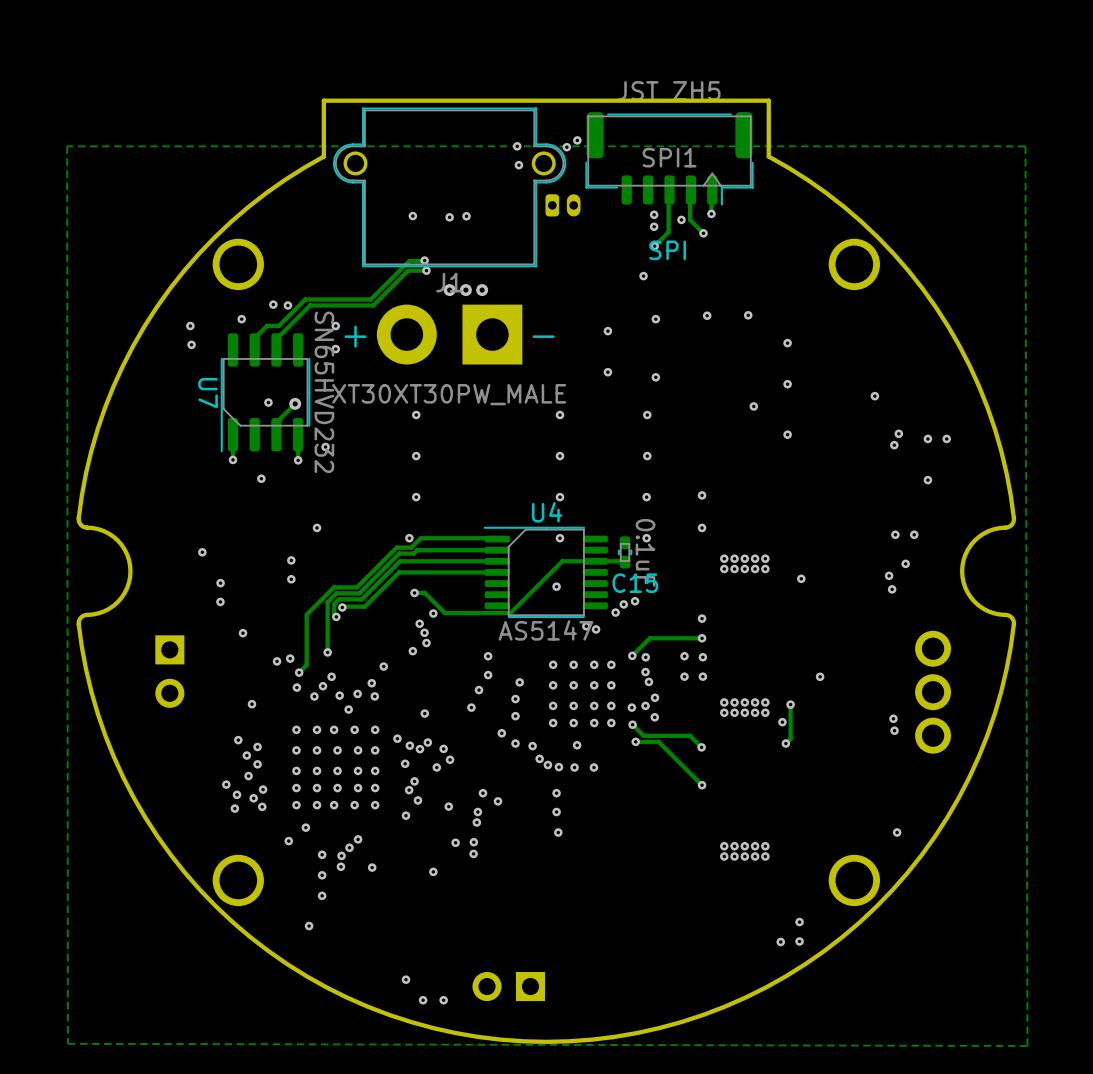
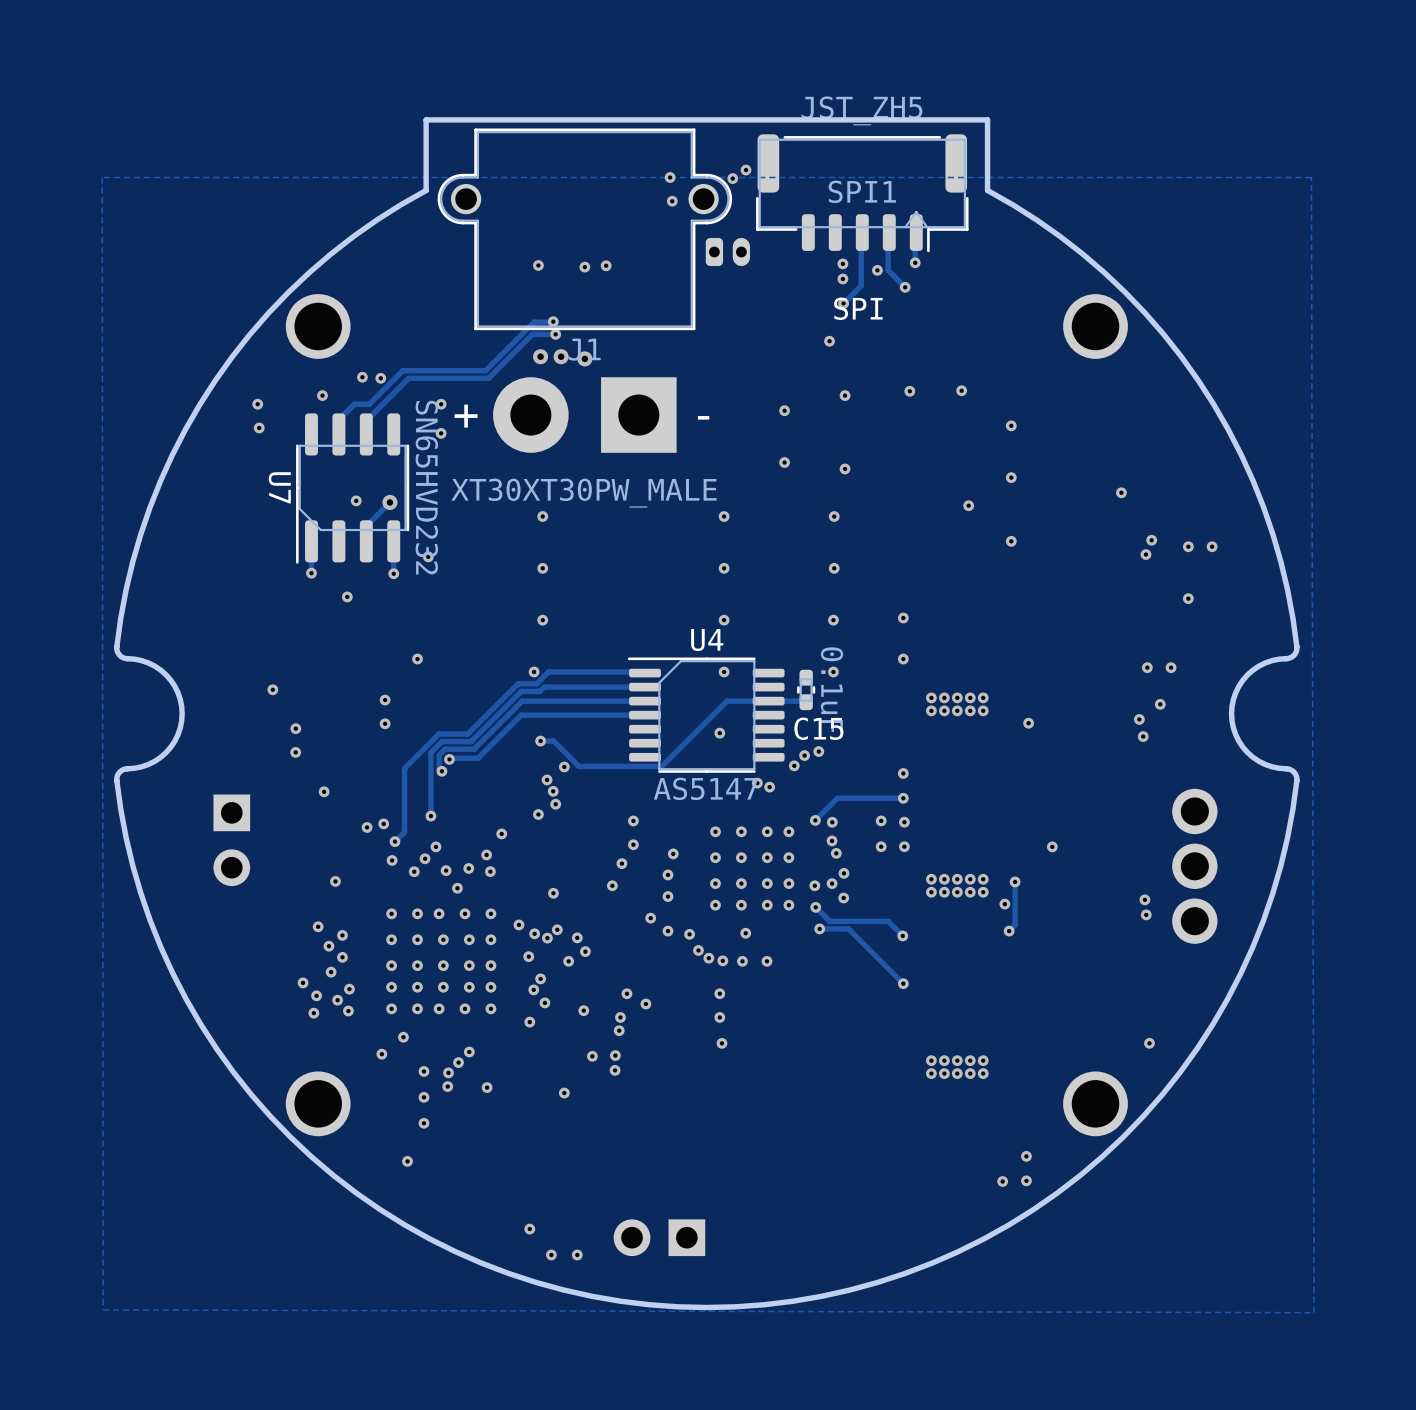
via: none -> (540, 356)
via: none -> (561, 356)
via: (465, 290) -> none
via: (482, 290) -> none

